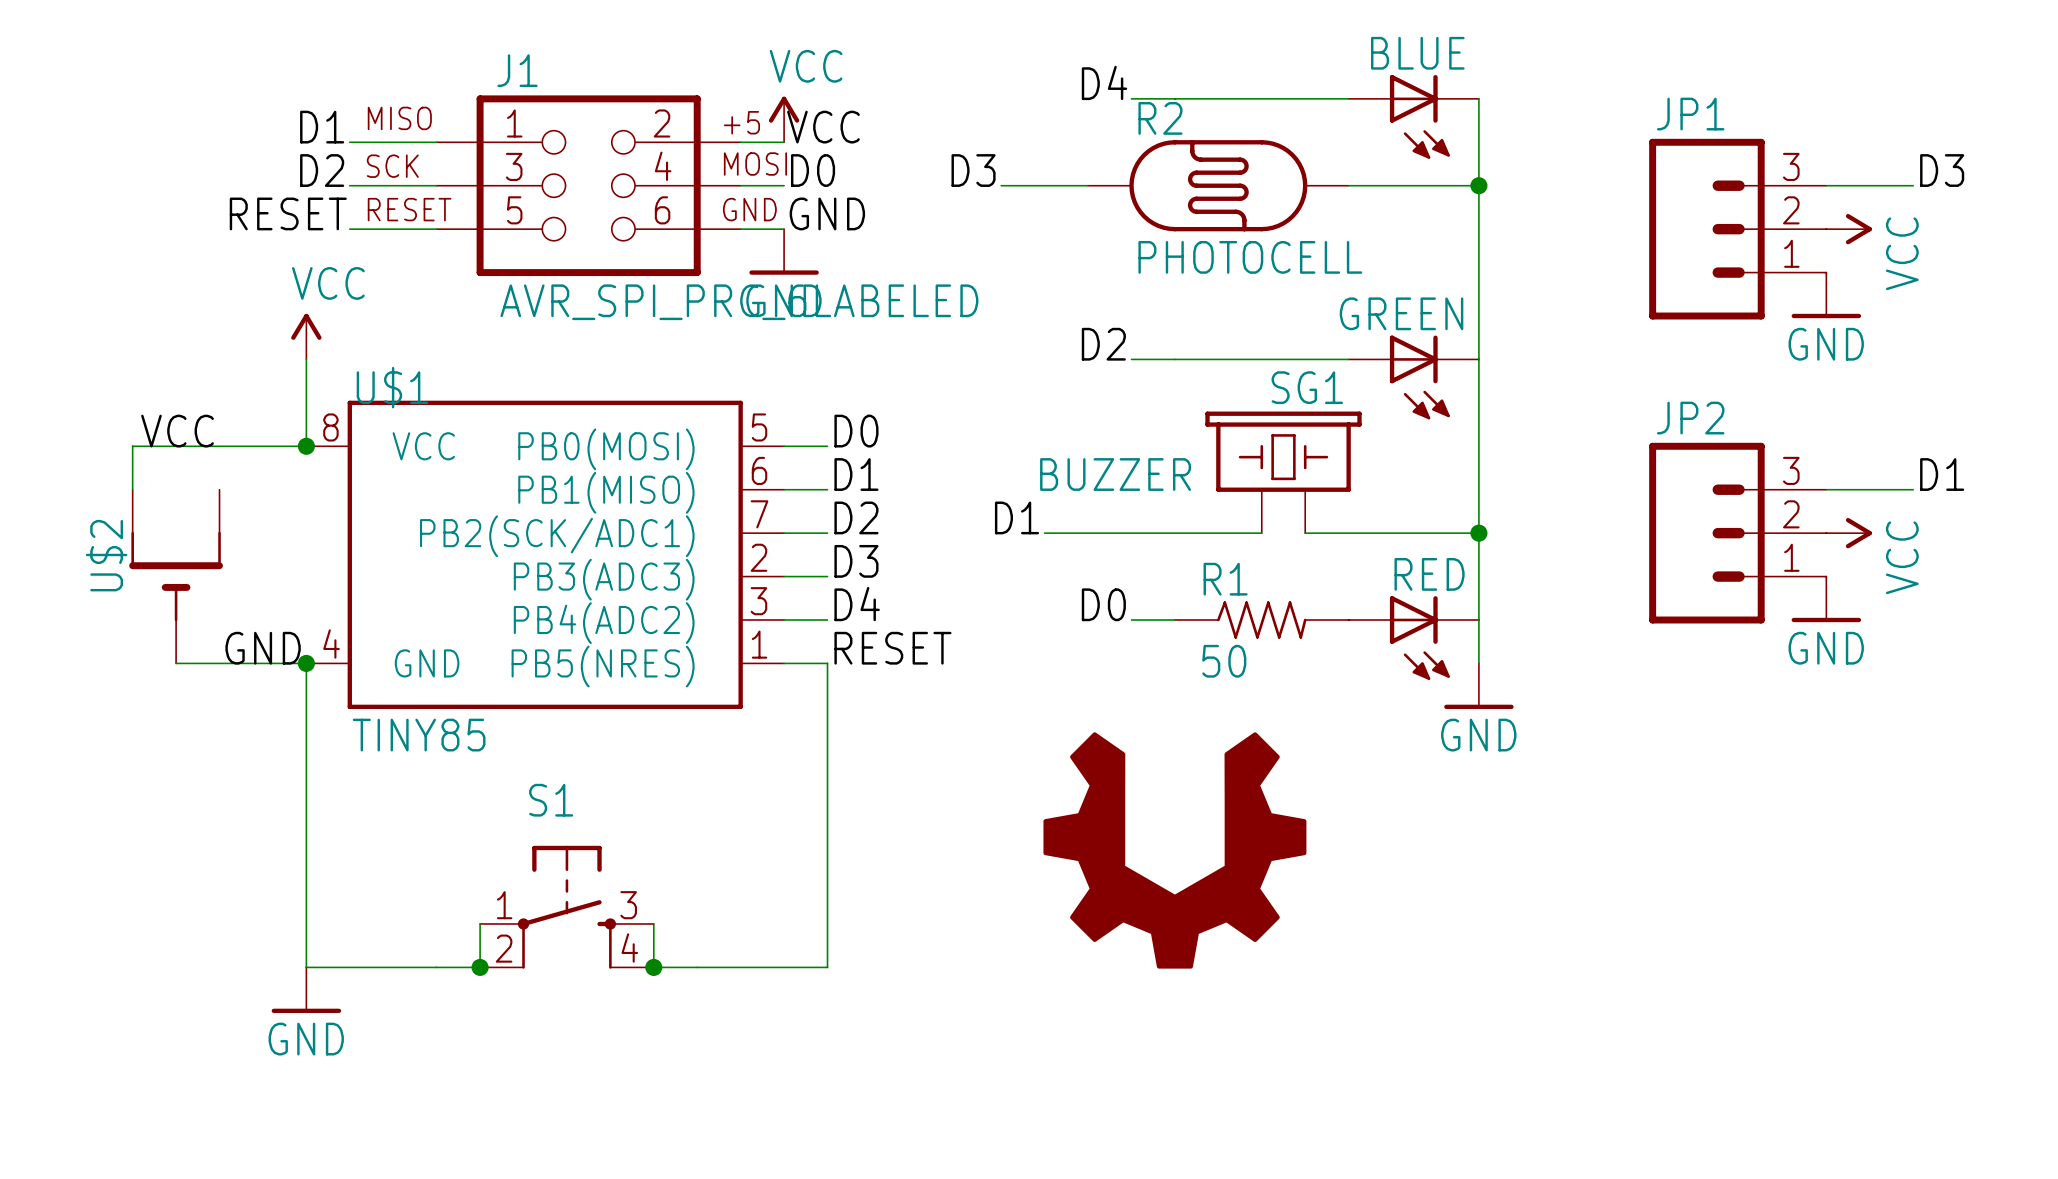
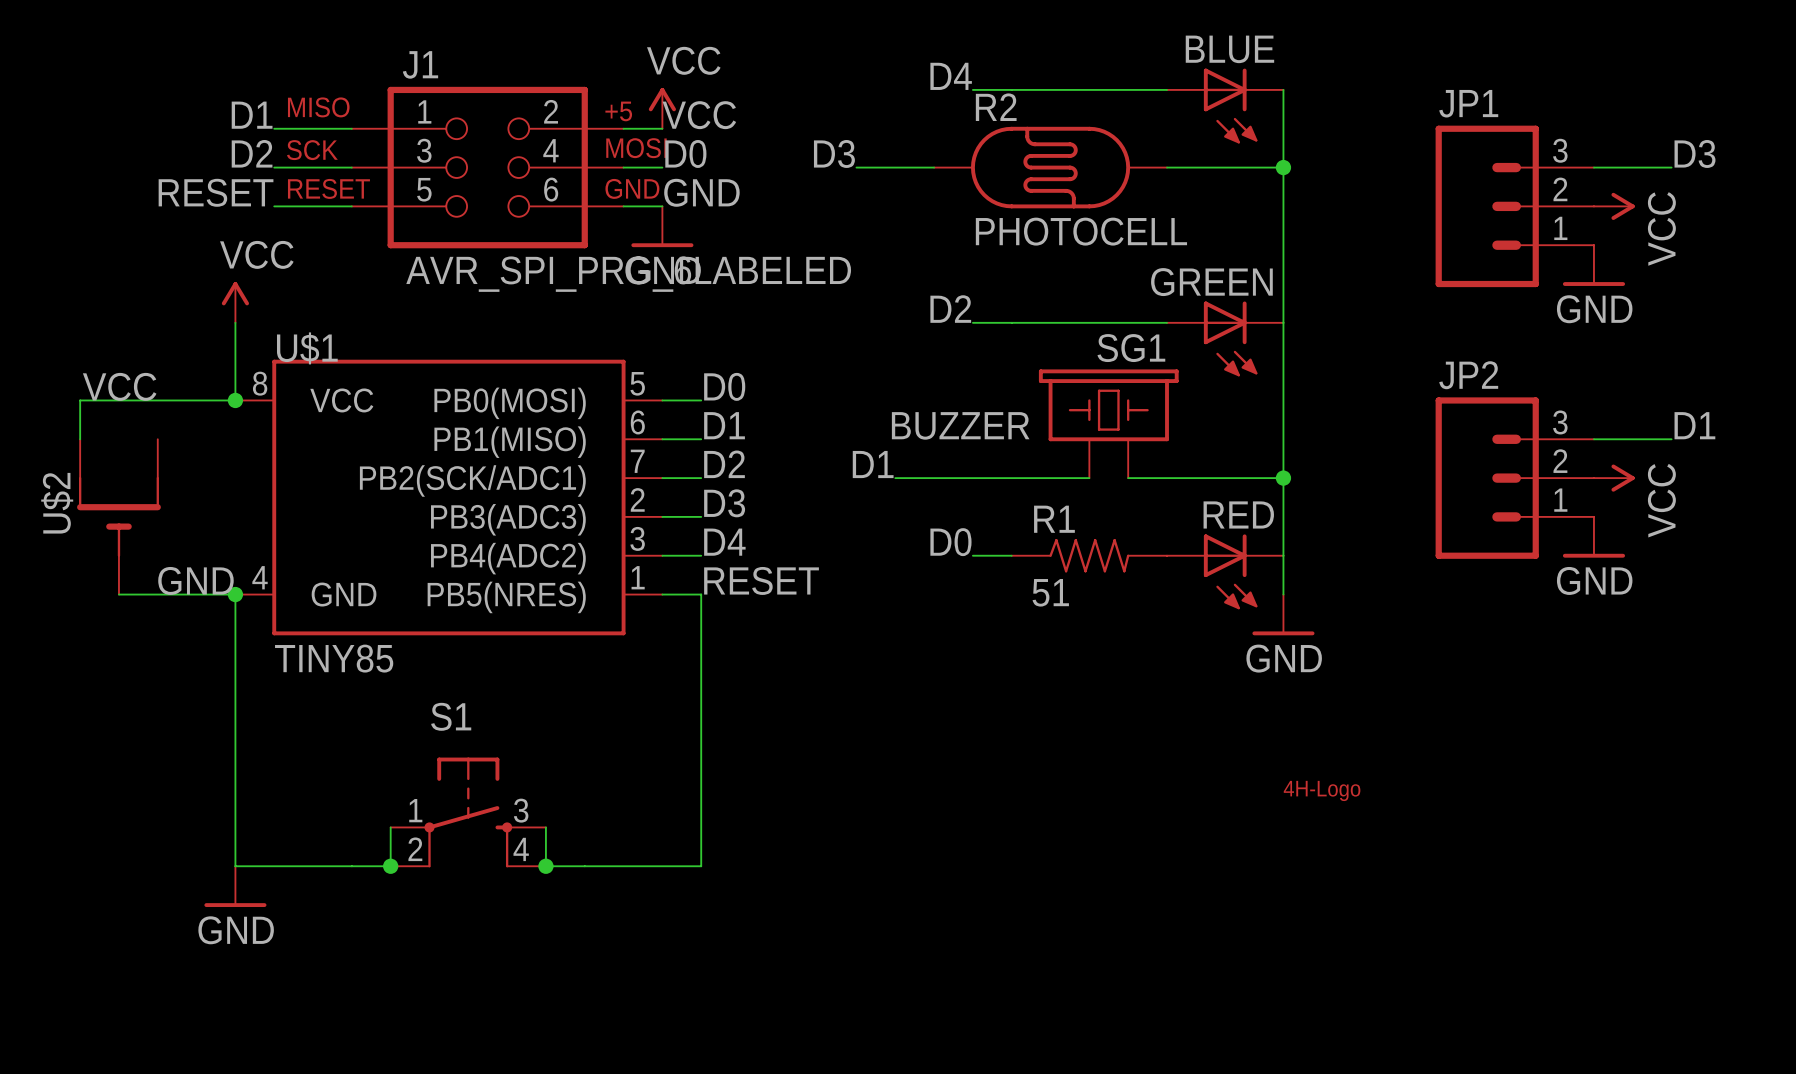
R1 value: 50 (1224, 661) -> 51 (1050, 592)
part: (1174, 850) -> none
part: none -> (1322, 790)

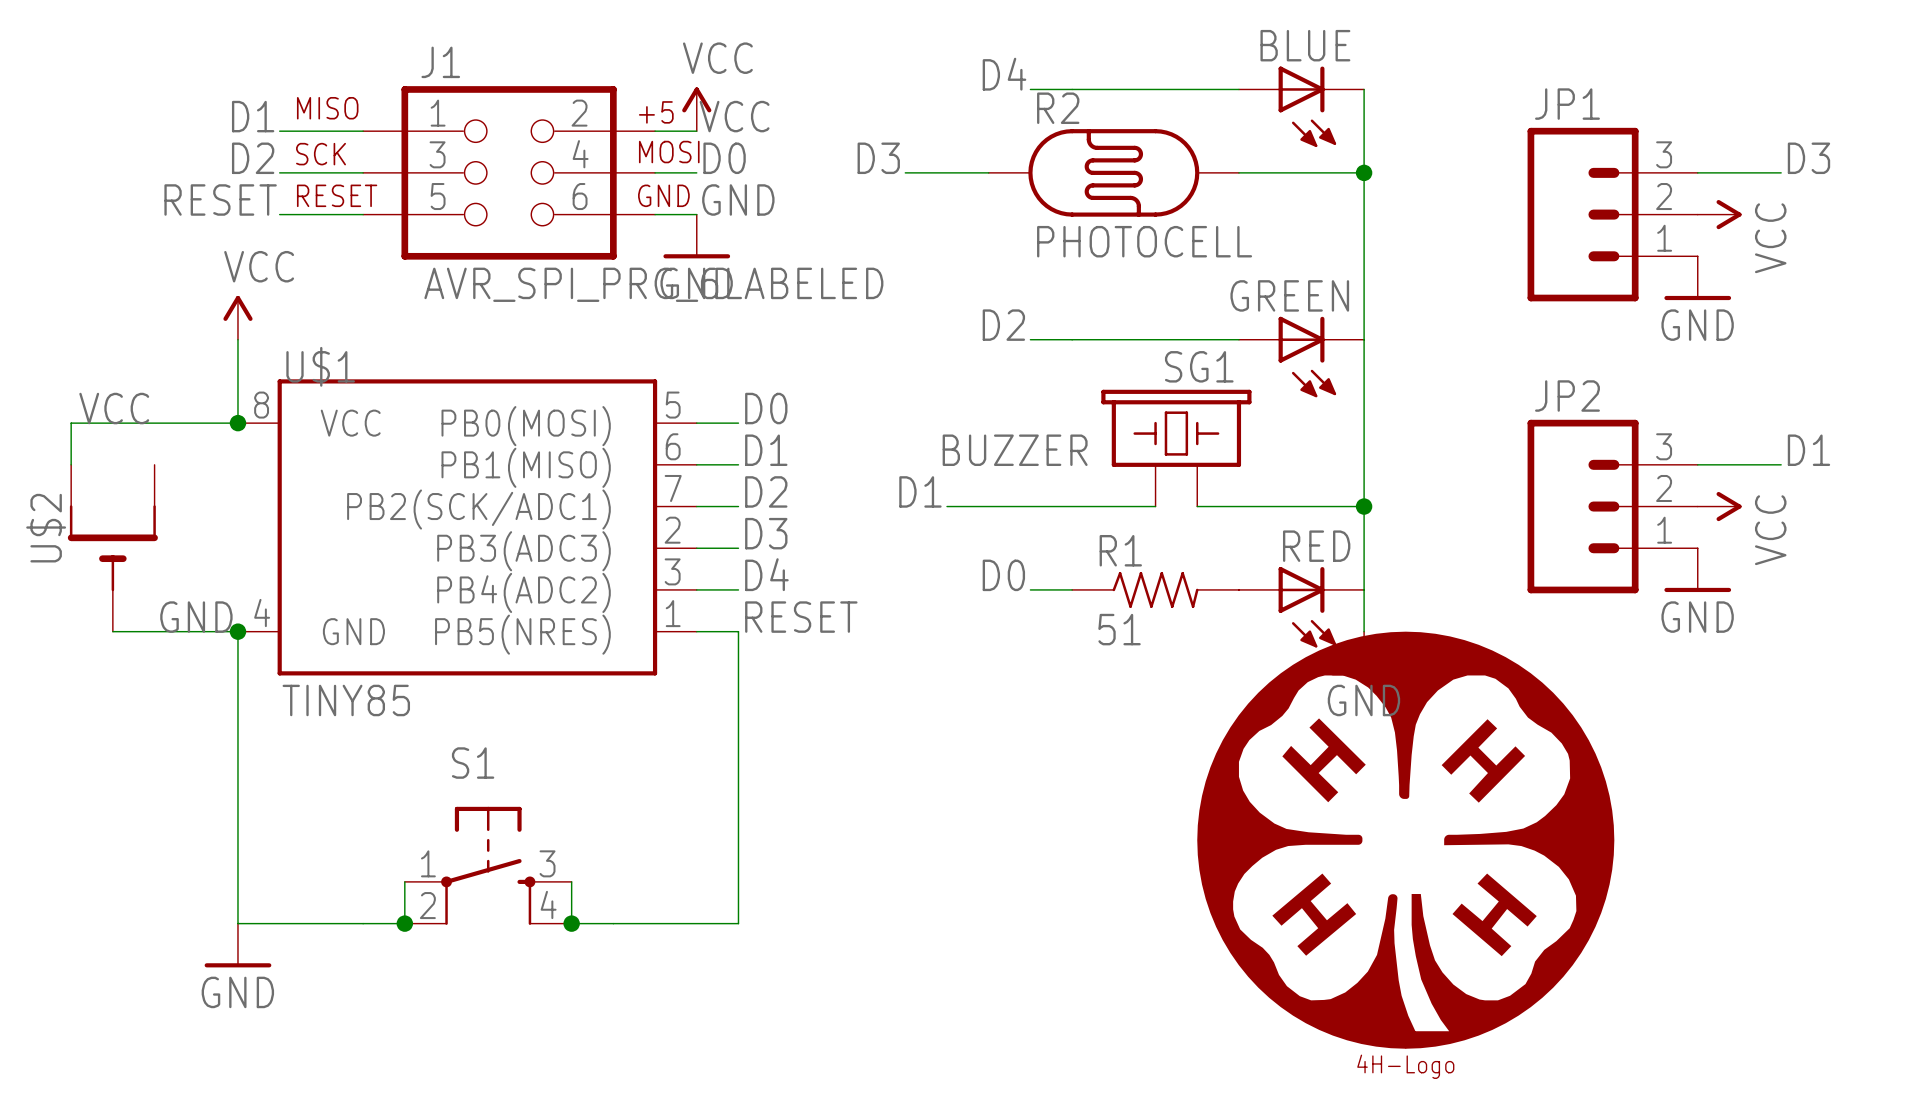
part symbol: [1283, 780, 1361, 802] -> [1197, 631, 1615, 1049]

